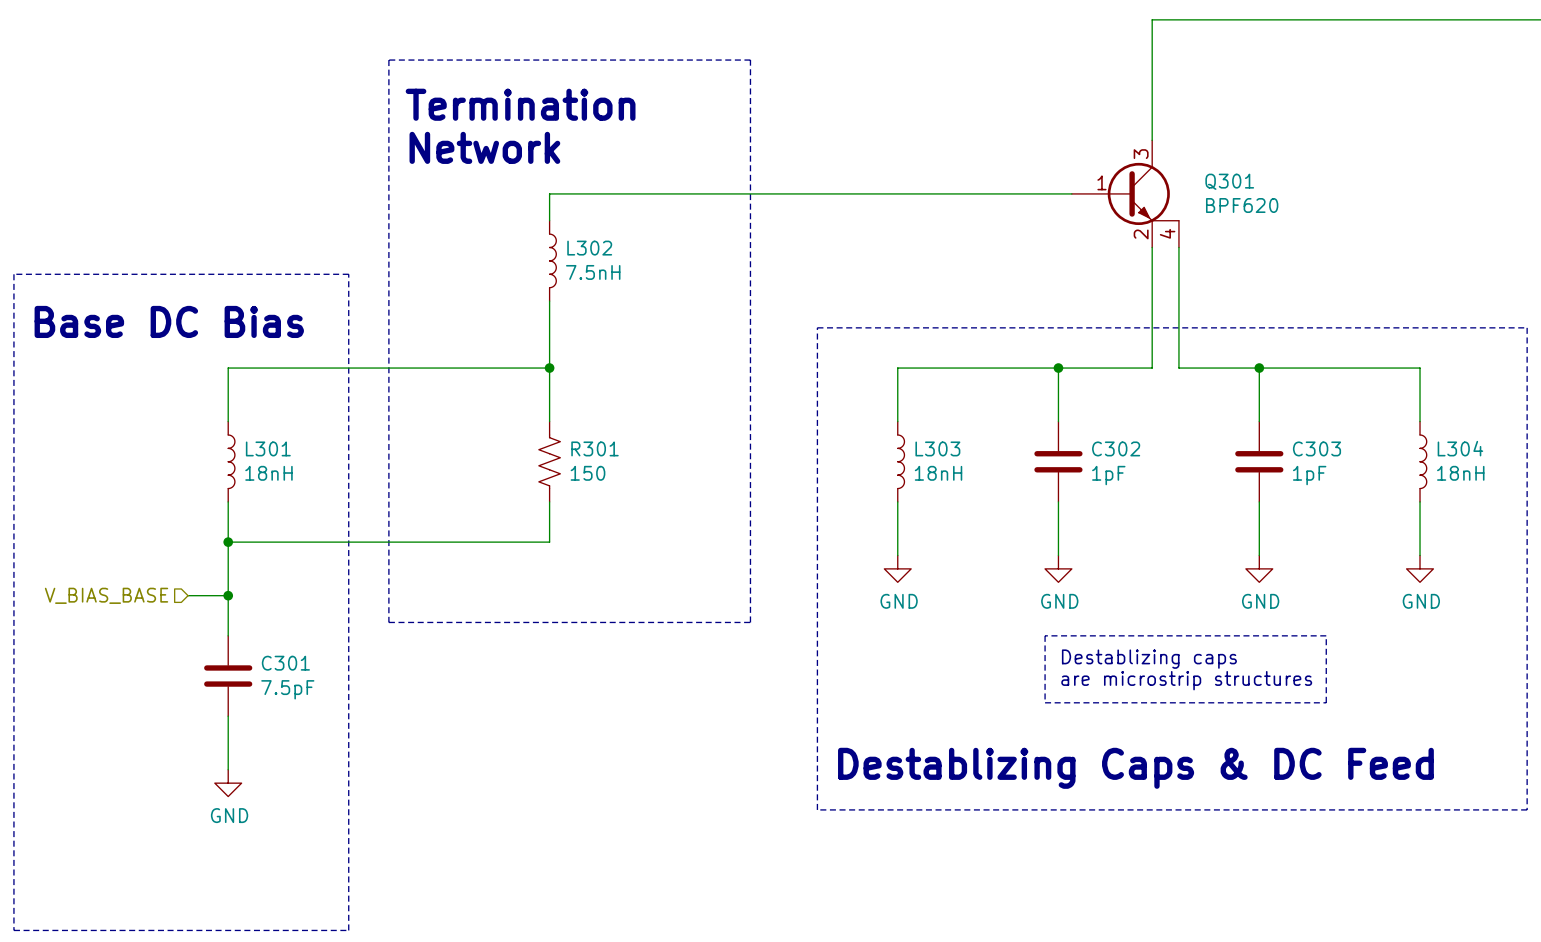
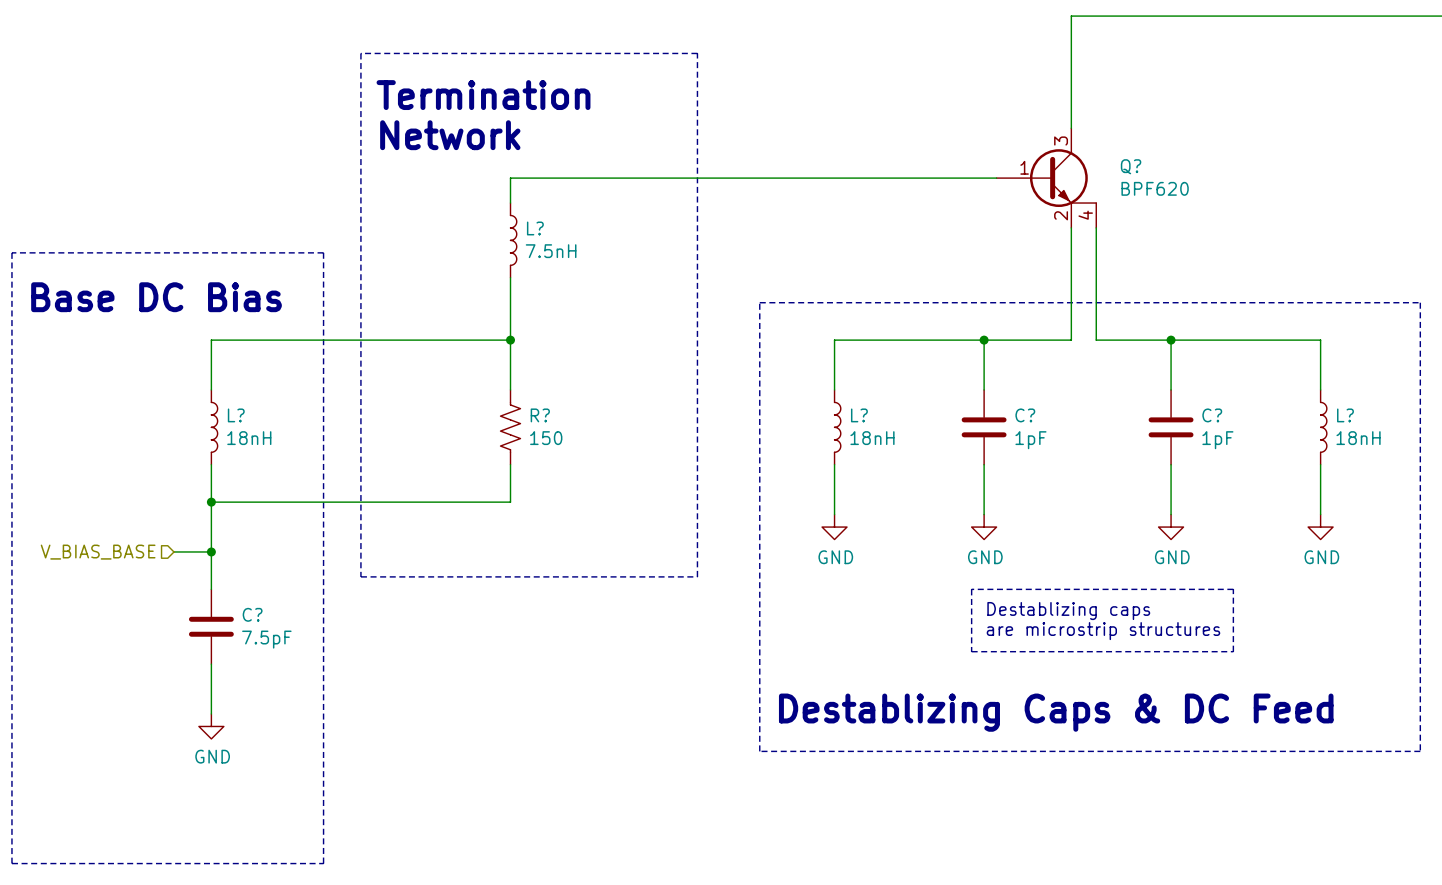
Q301 name: Q301 (1229, 181) -> Q? (1131, 166)
L302 name: L302 (589, 248) -> L? (535, 228)
L301 name: L301 (268, 448) -> L? (236, 415)
R301 name: R301 (595, 448) -> R? (540, 415)
L303 name: L303 (937, 448) -> L? (859, 415)
C302 name: C302 (1116, 448) -> C? (1025, 415)
C303 name: C303 (1316, 448) -> C? (1212, 415)
L304 name: L304 (1460, 448) -> L? (1345, 415)
C301 name: C301 (285, 663) -> C? (252, 614)

